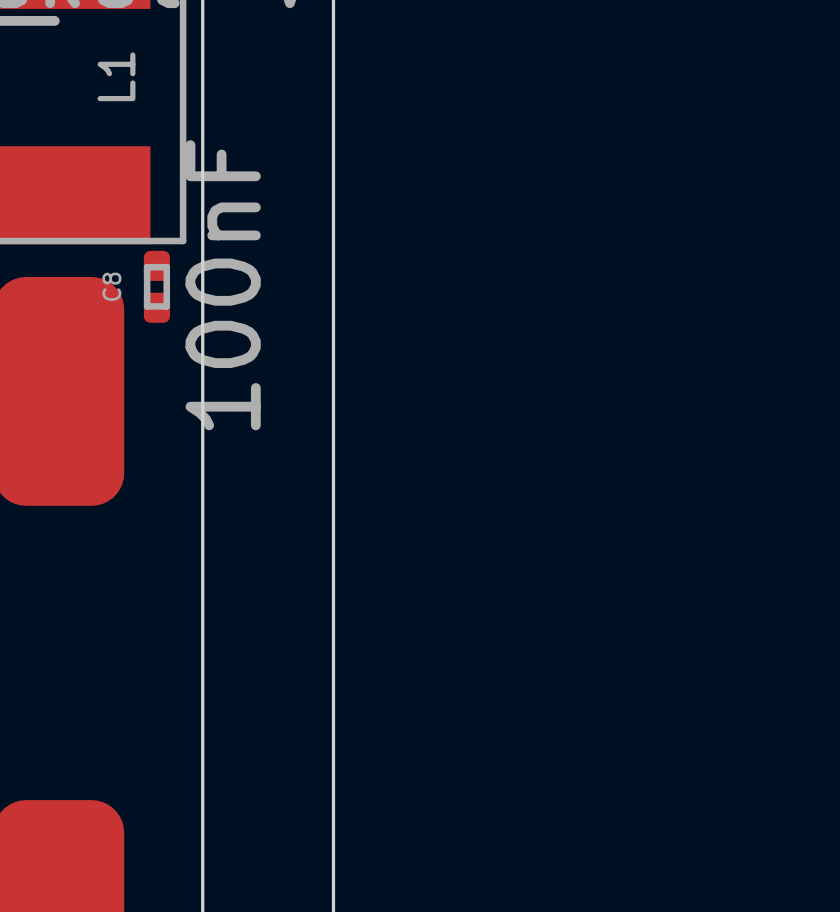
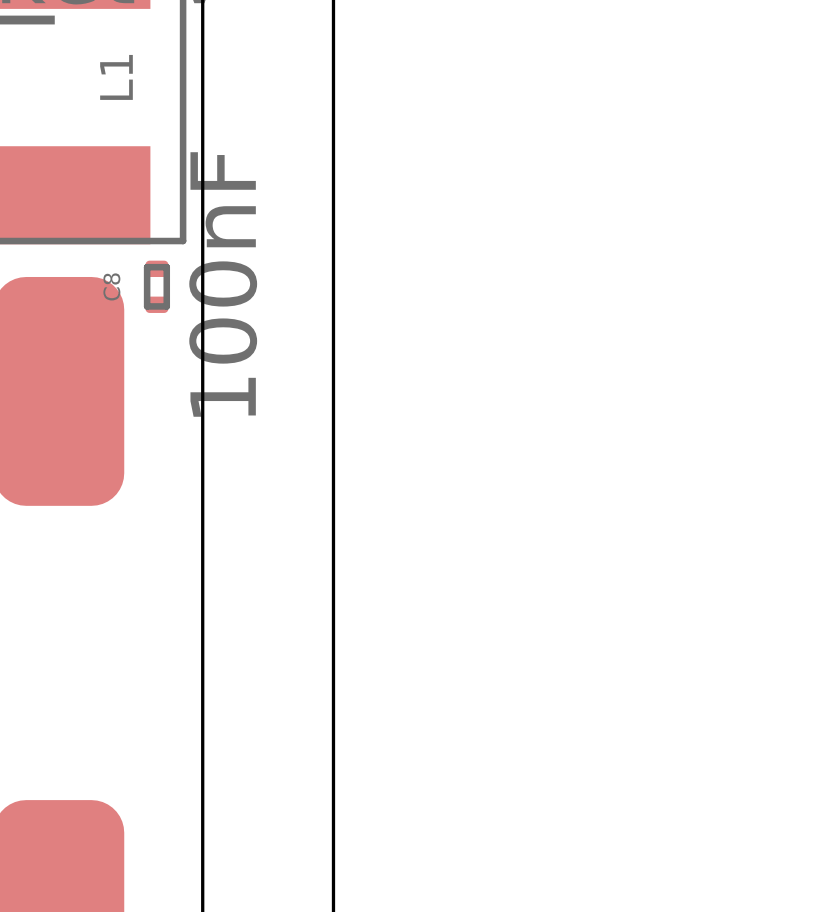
C8 footprint: [143, 250, 171, 323] -> [143, 260, 171, 313]

